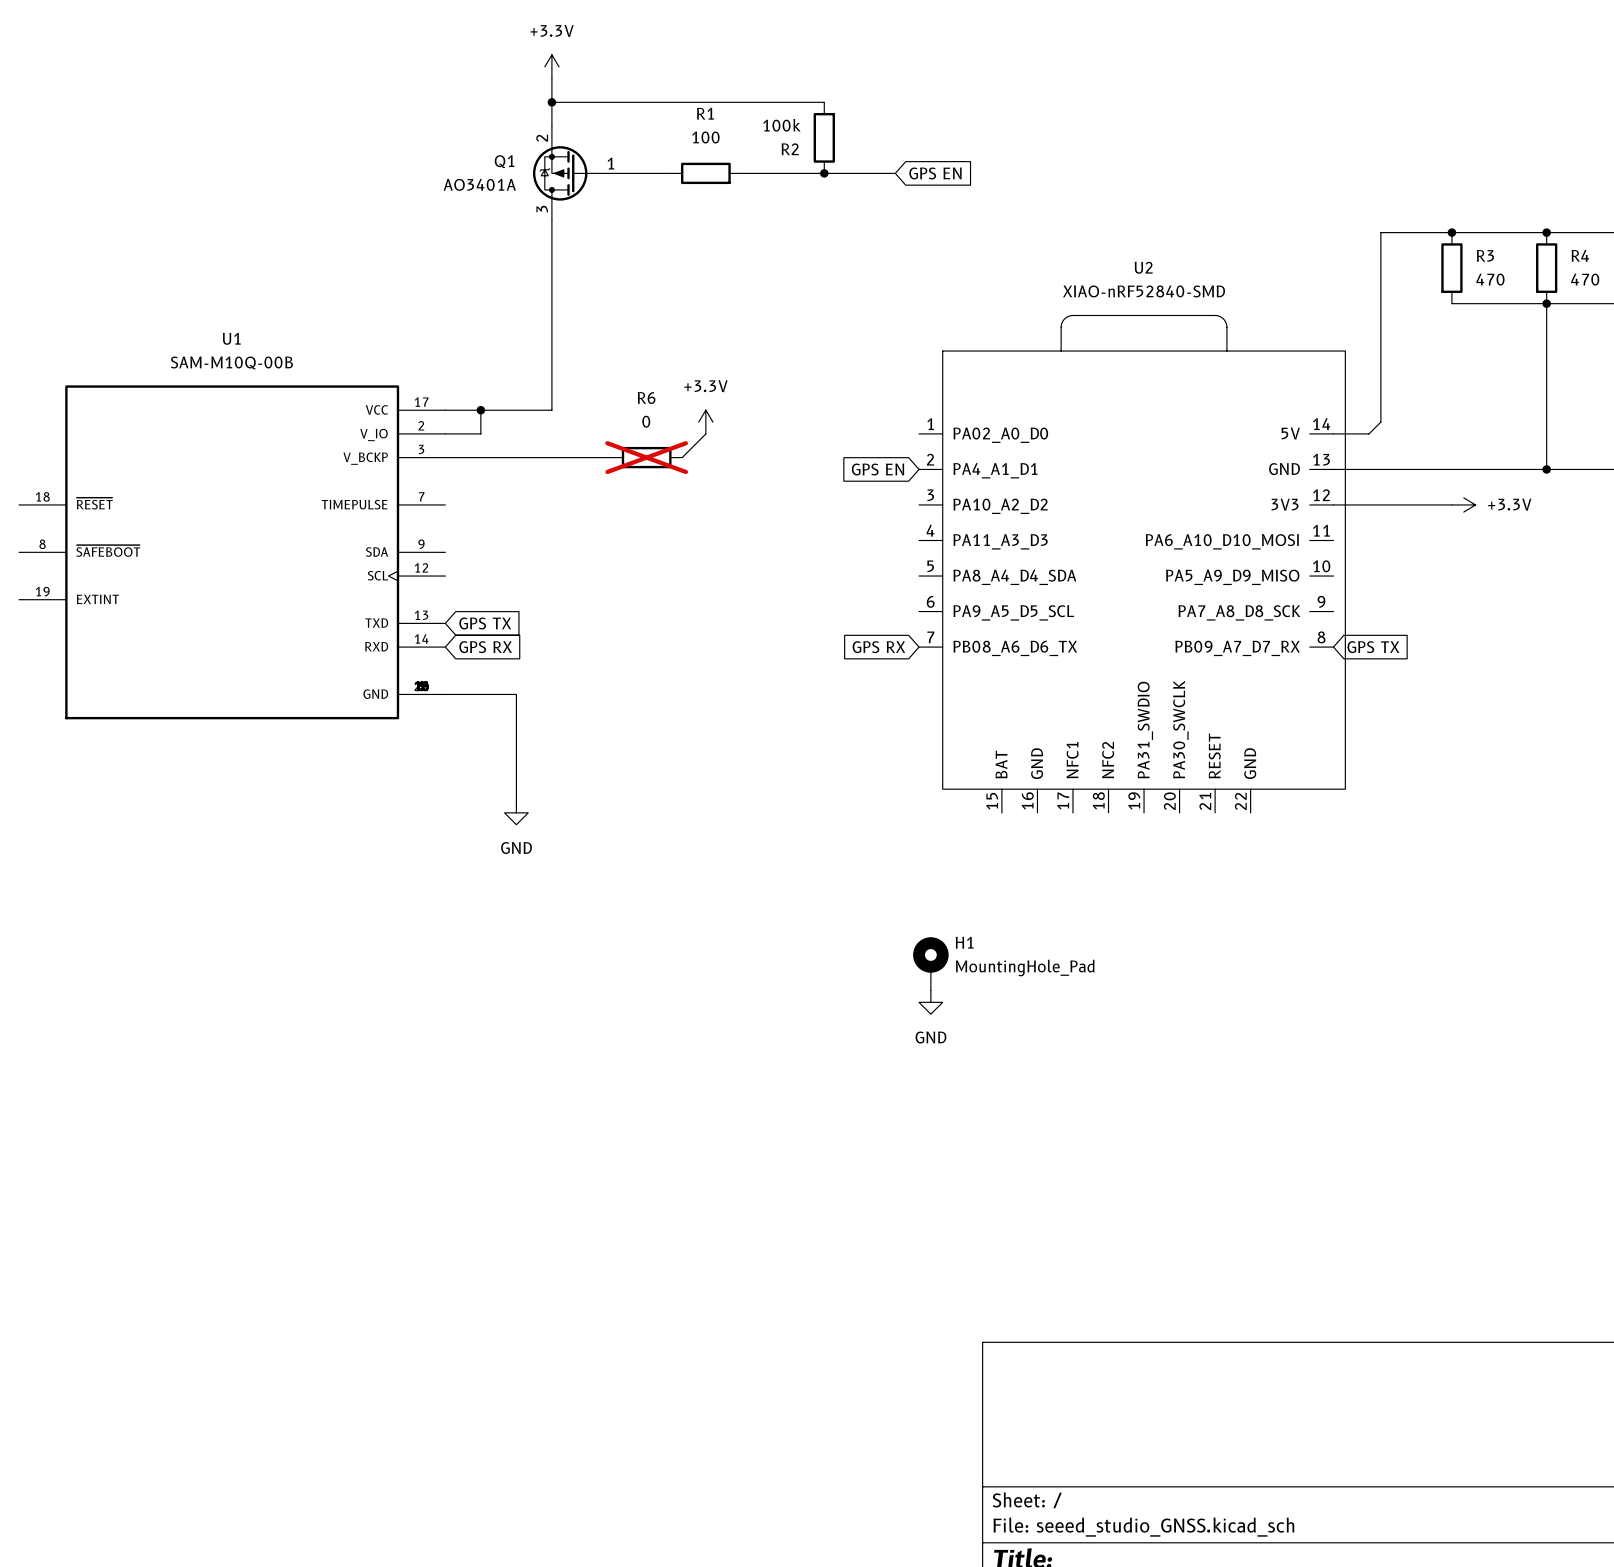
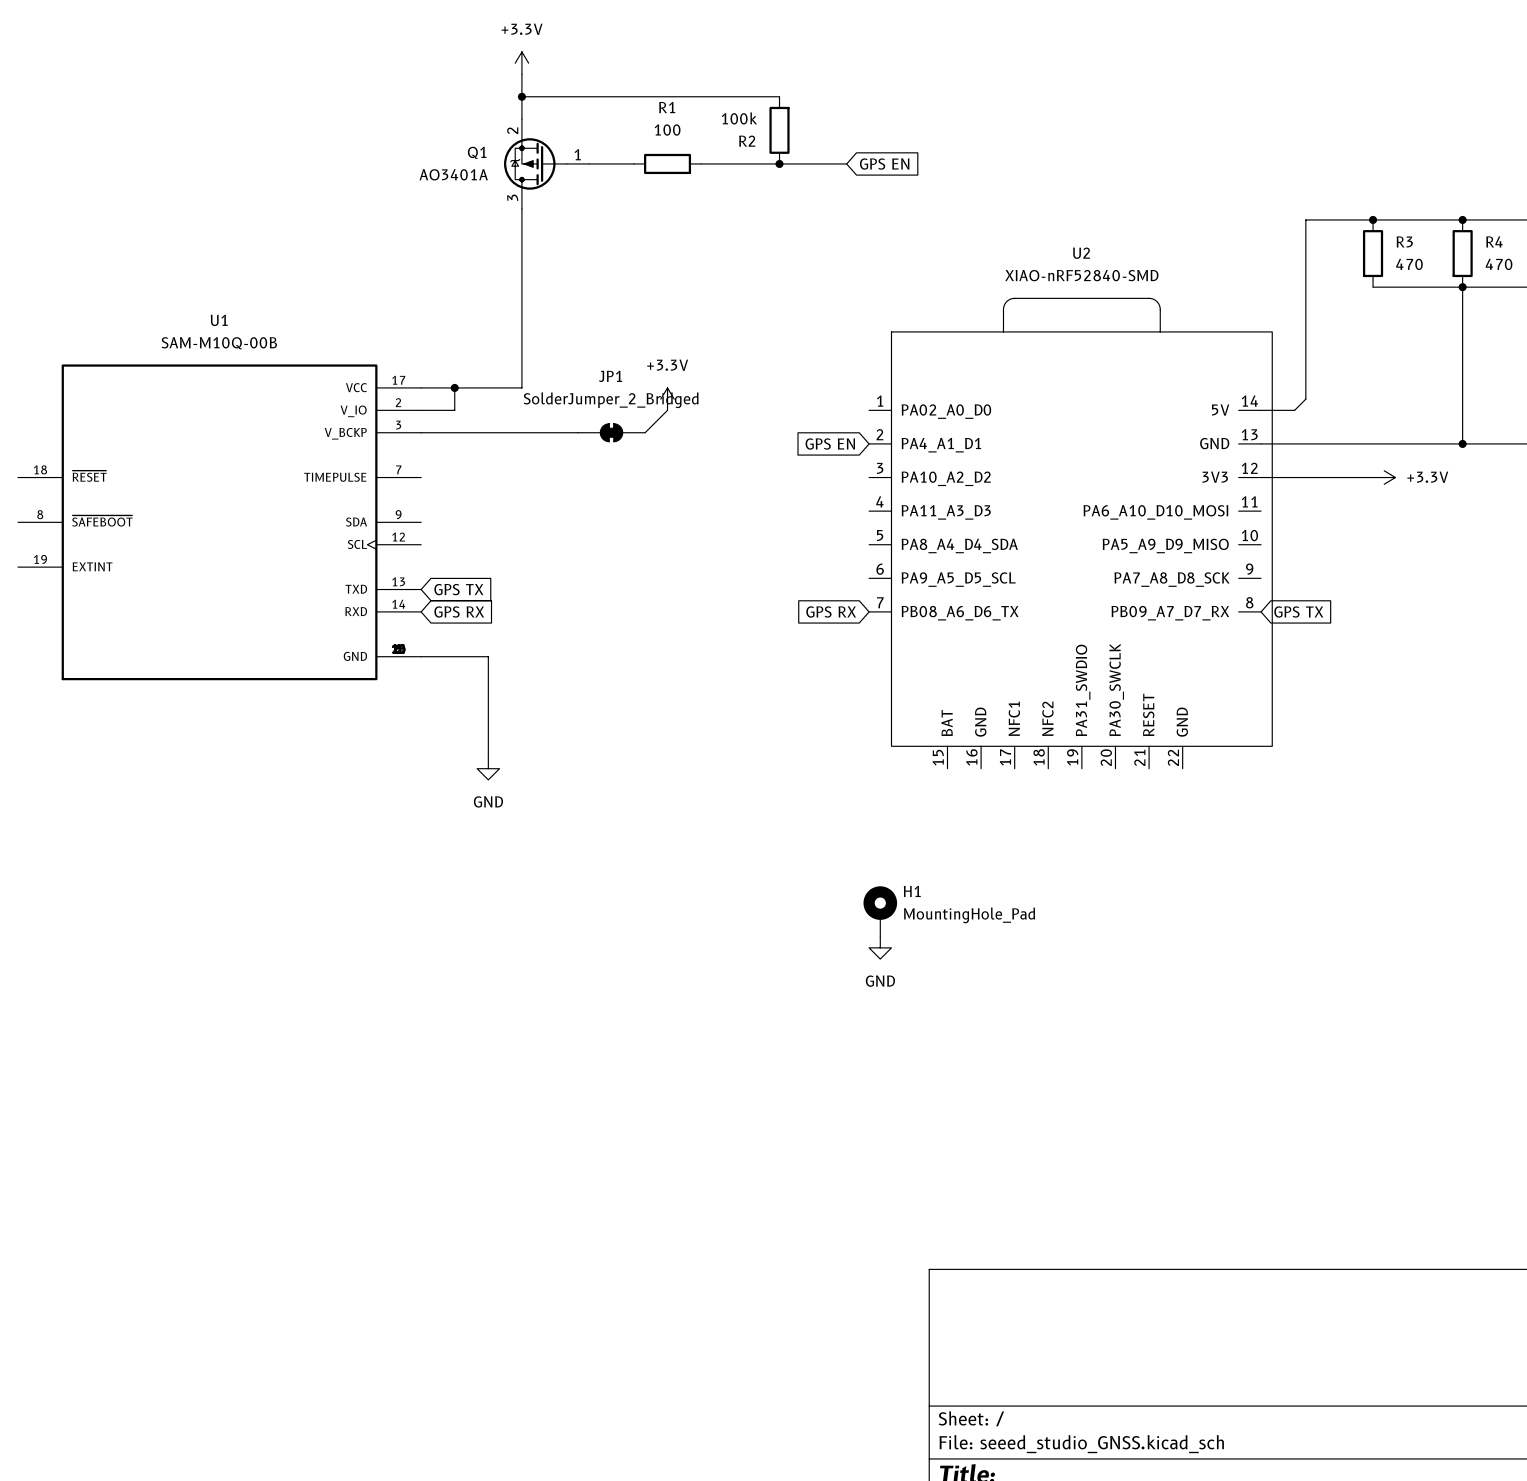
R6: 0 (646, 457) -> none
JP1: none -> SolderJumper_2_Bridged (611, 432)

